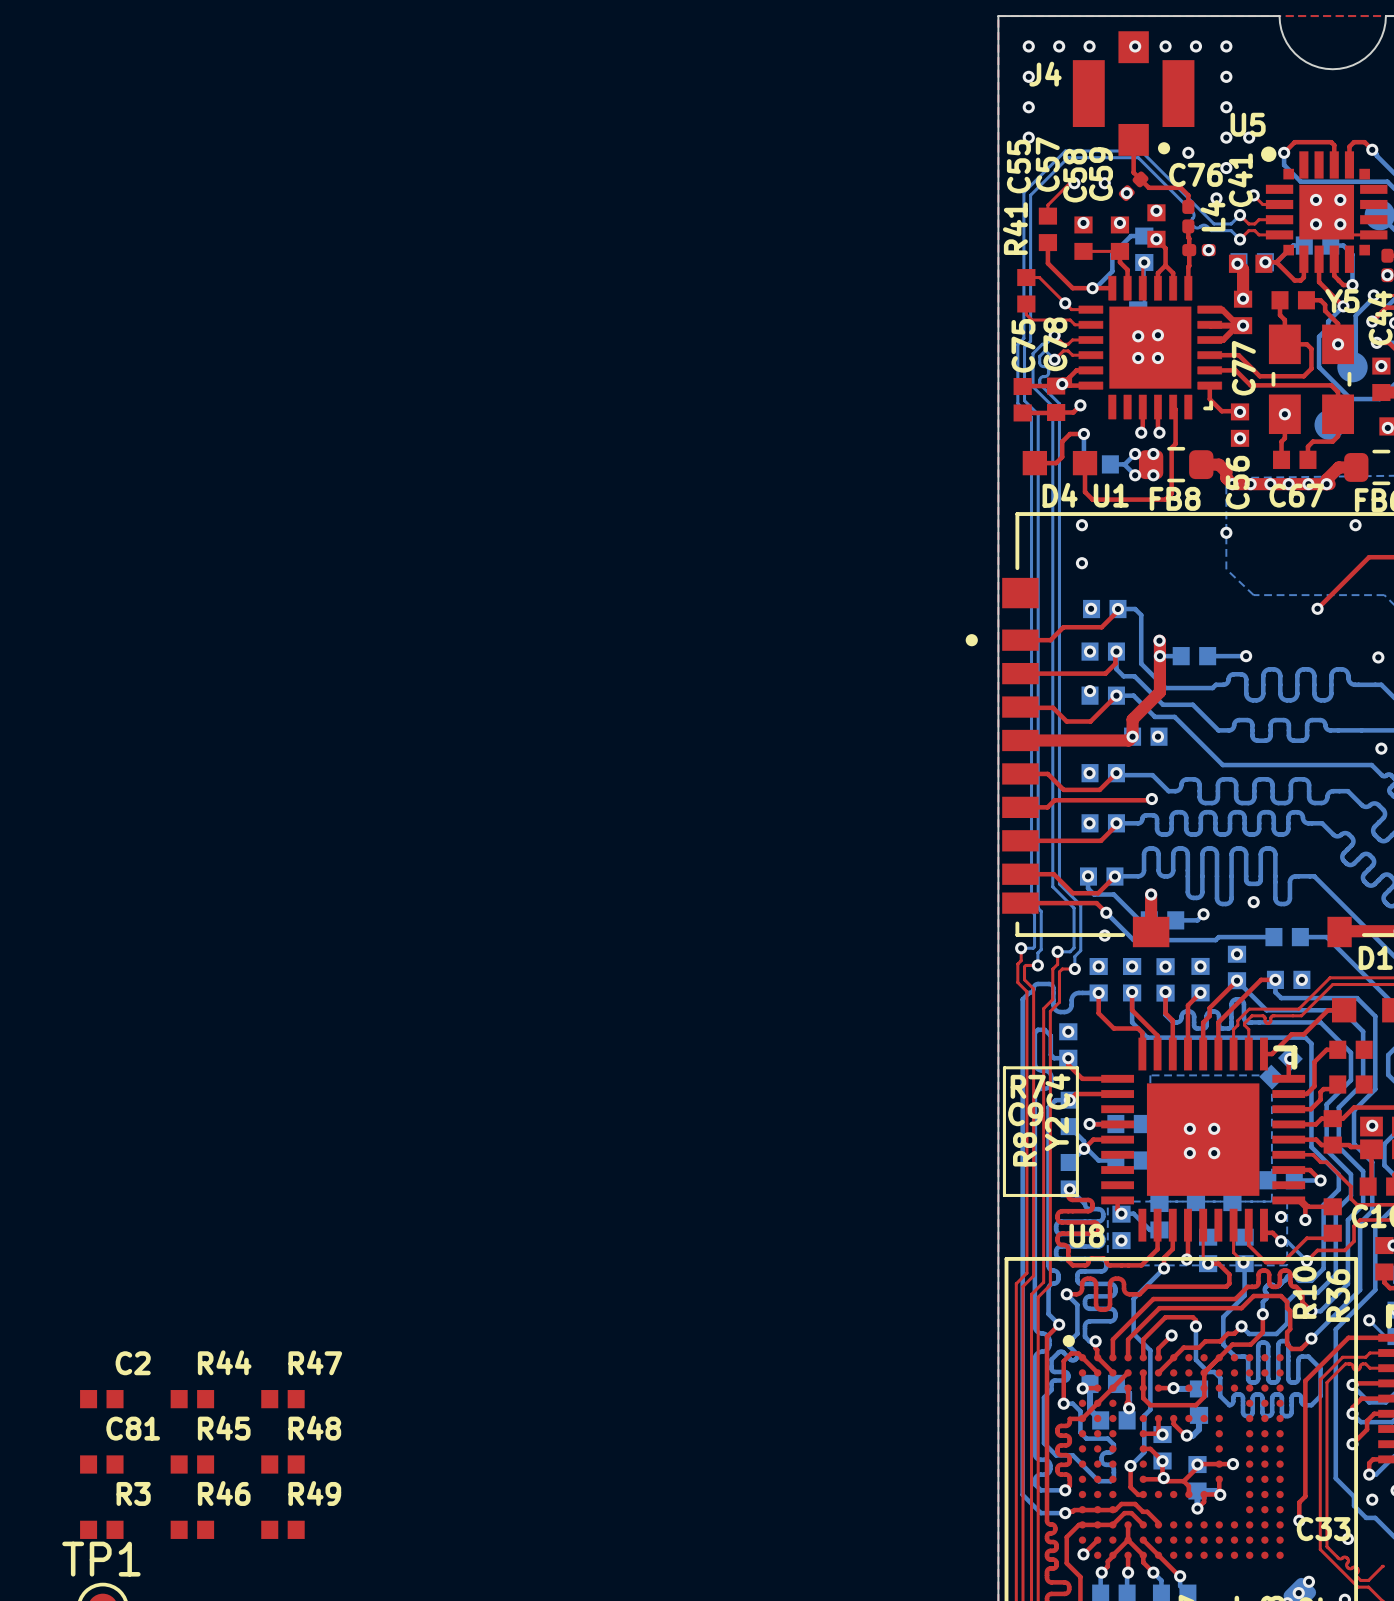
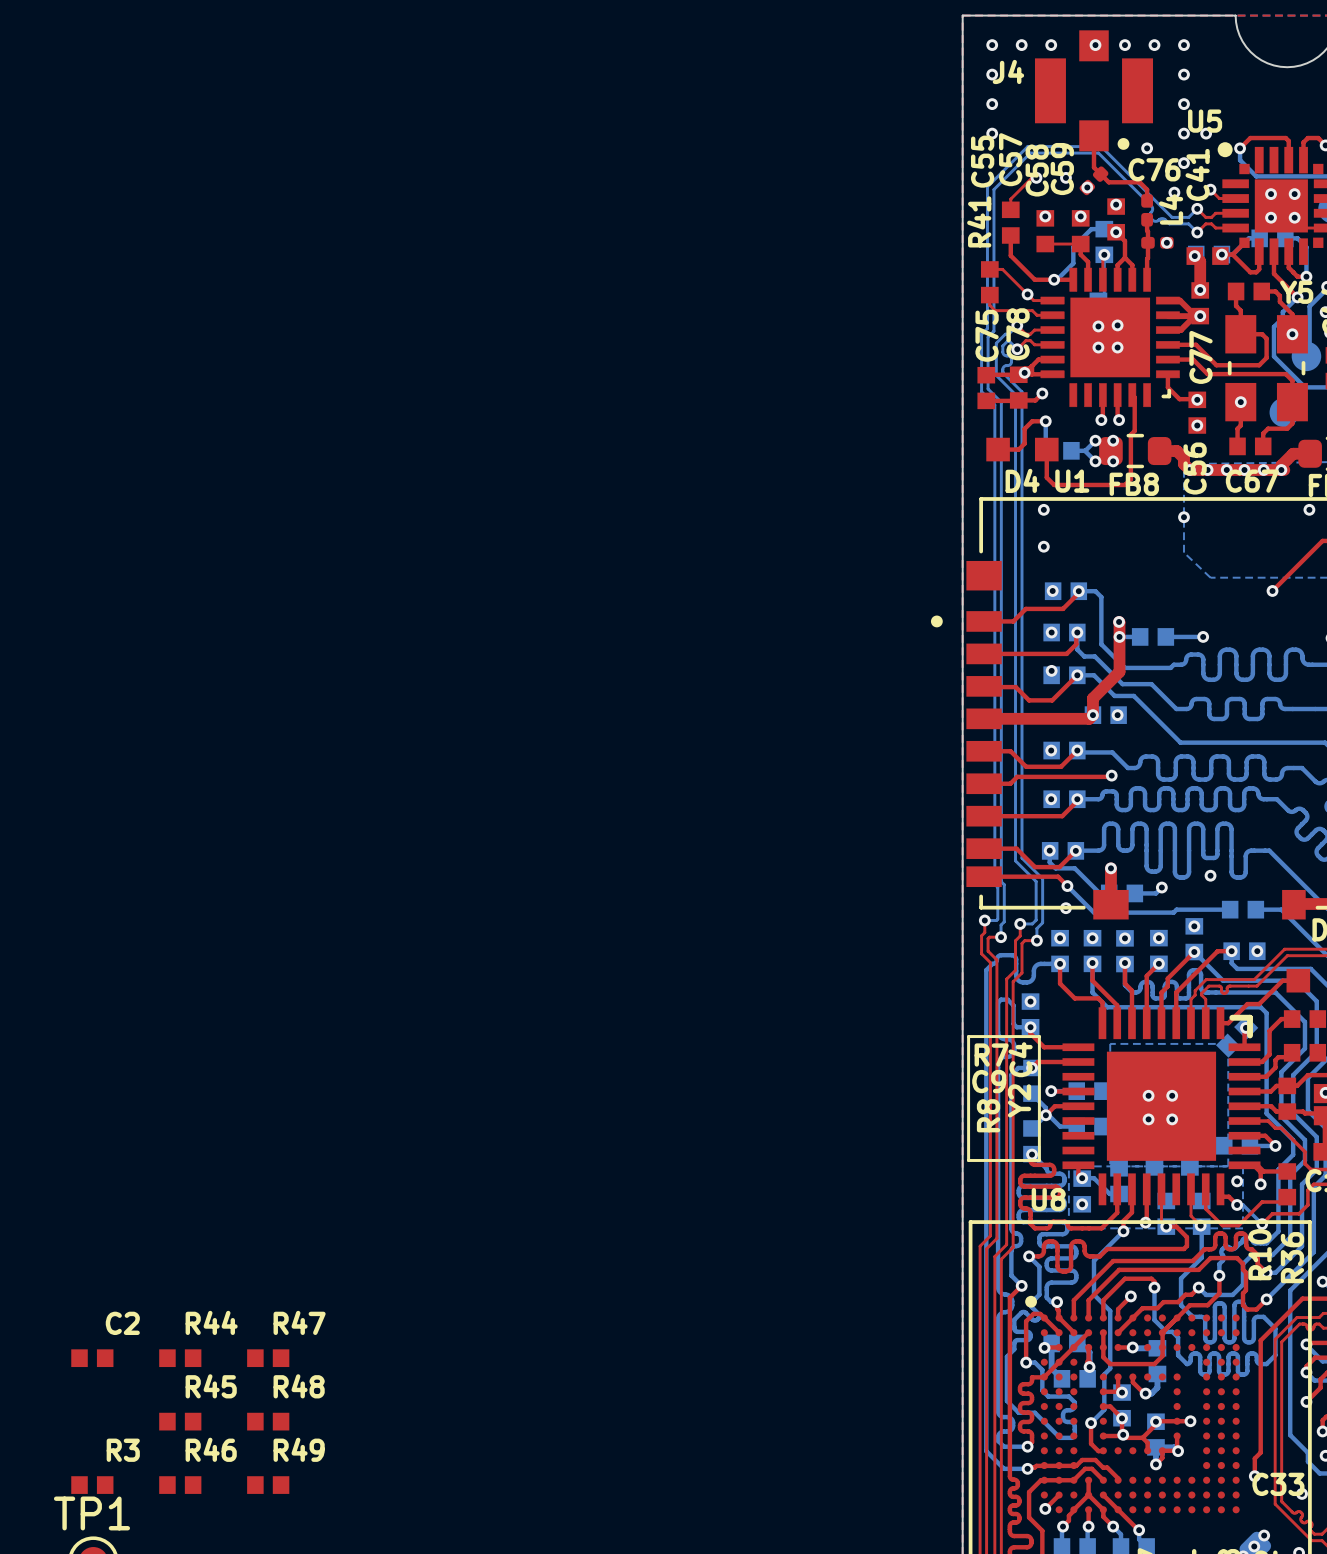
C81: (101, 1464) -> none

